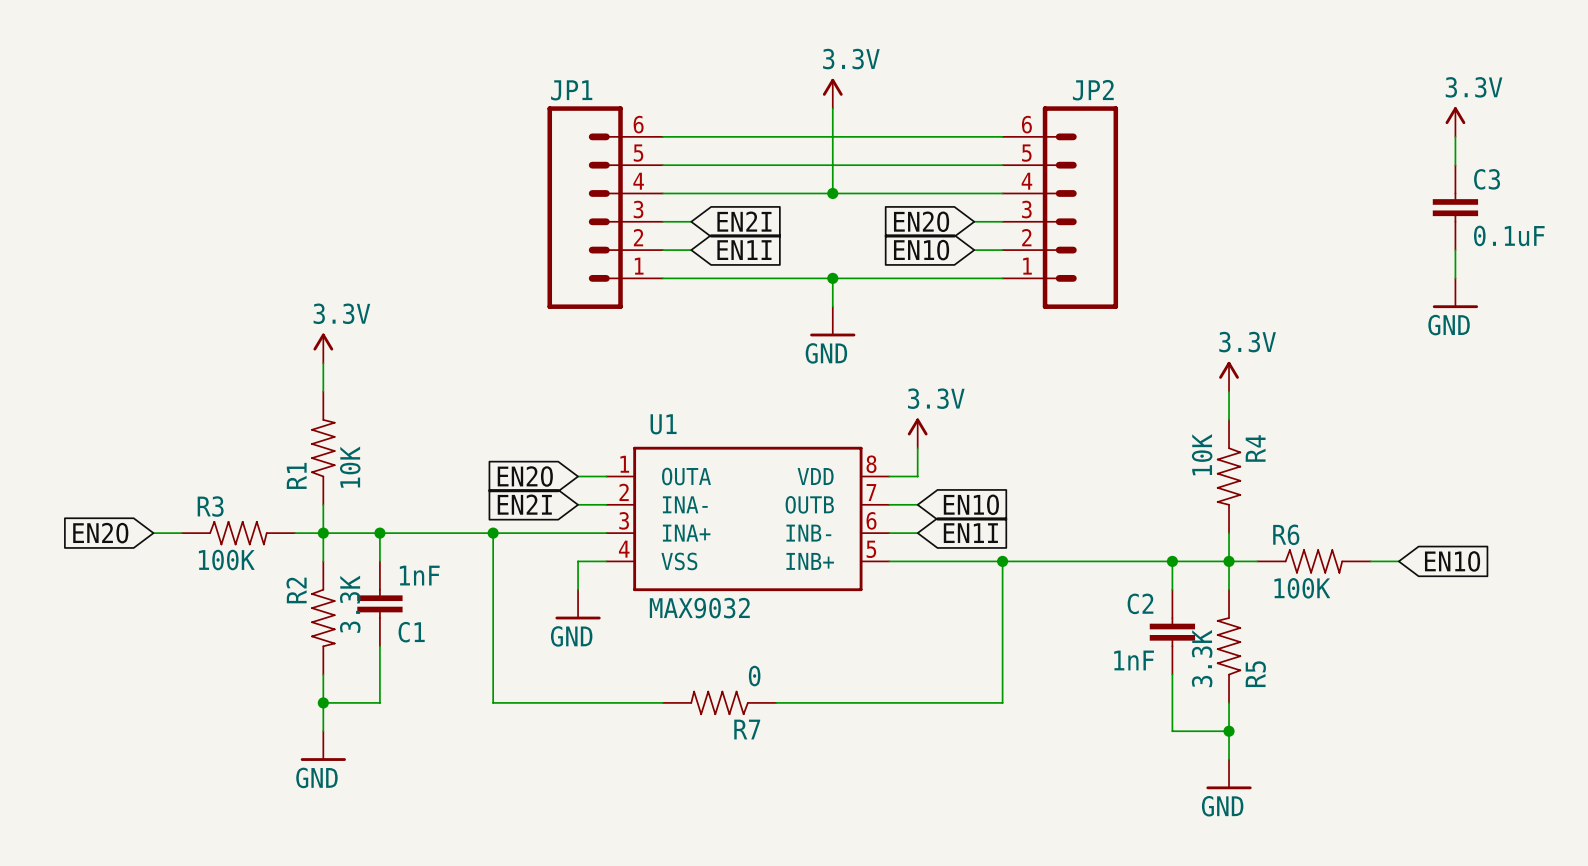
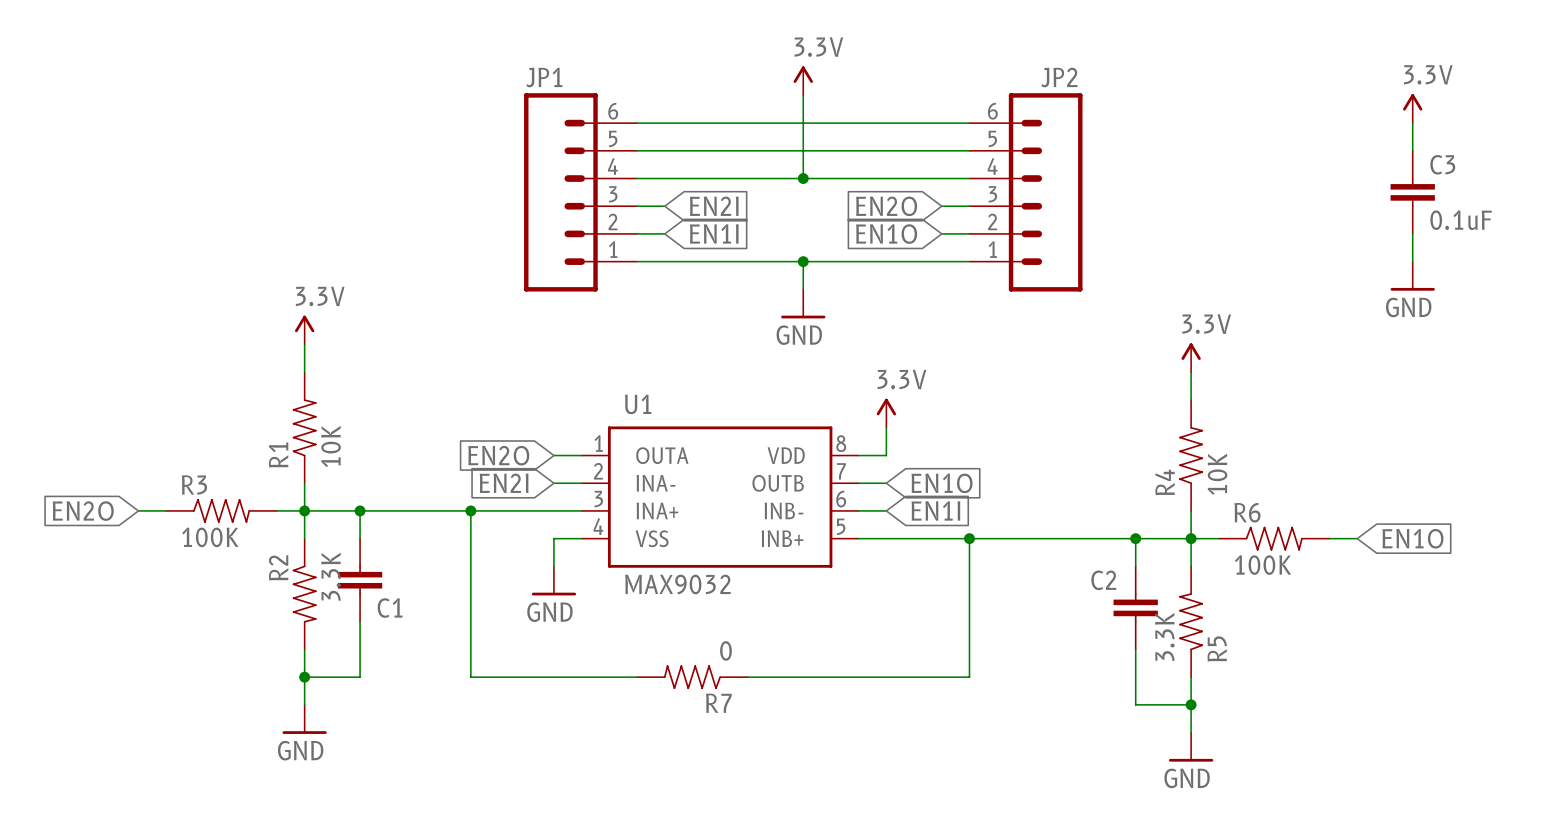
R4 rotation: 0° (1229, 476) -> 180° (1191, 455)
C1 value: 1nF (419, 575) -> none
C2 value: 1nF (1134, 660) -> none

